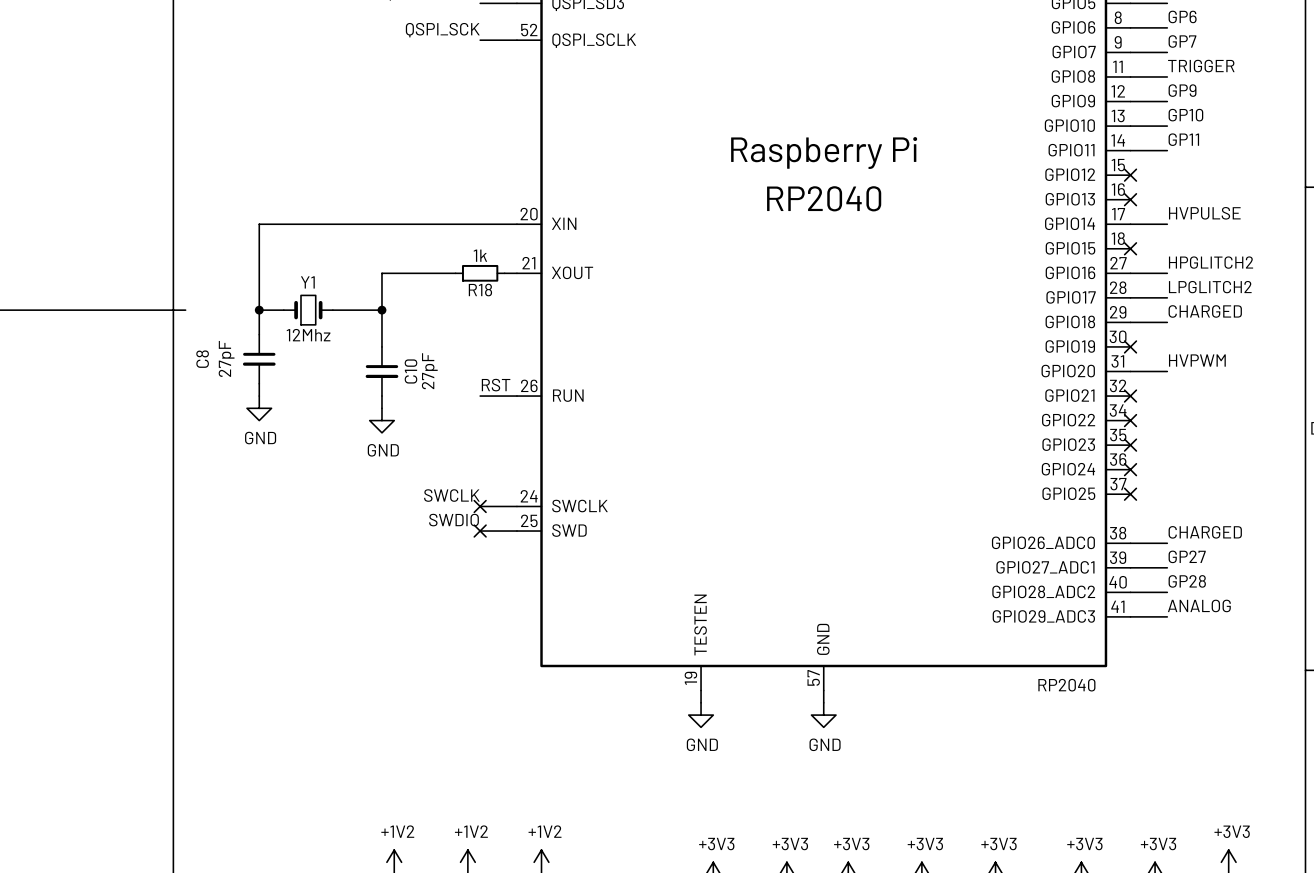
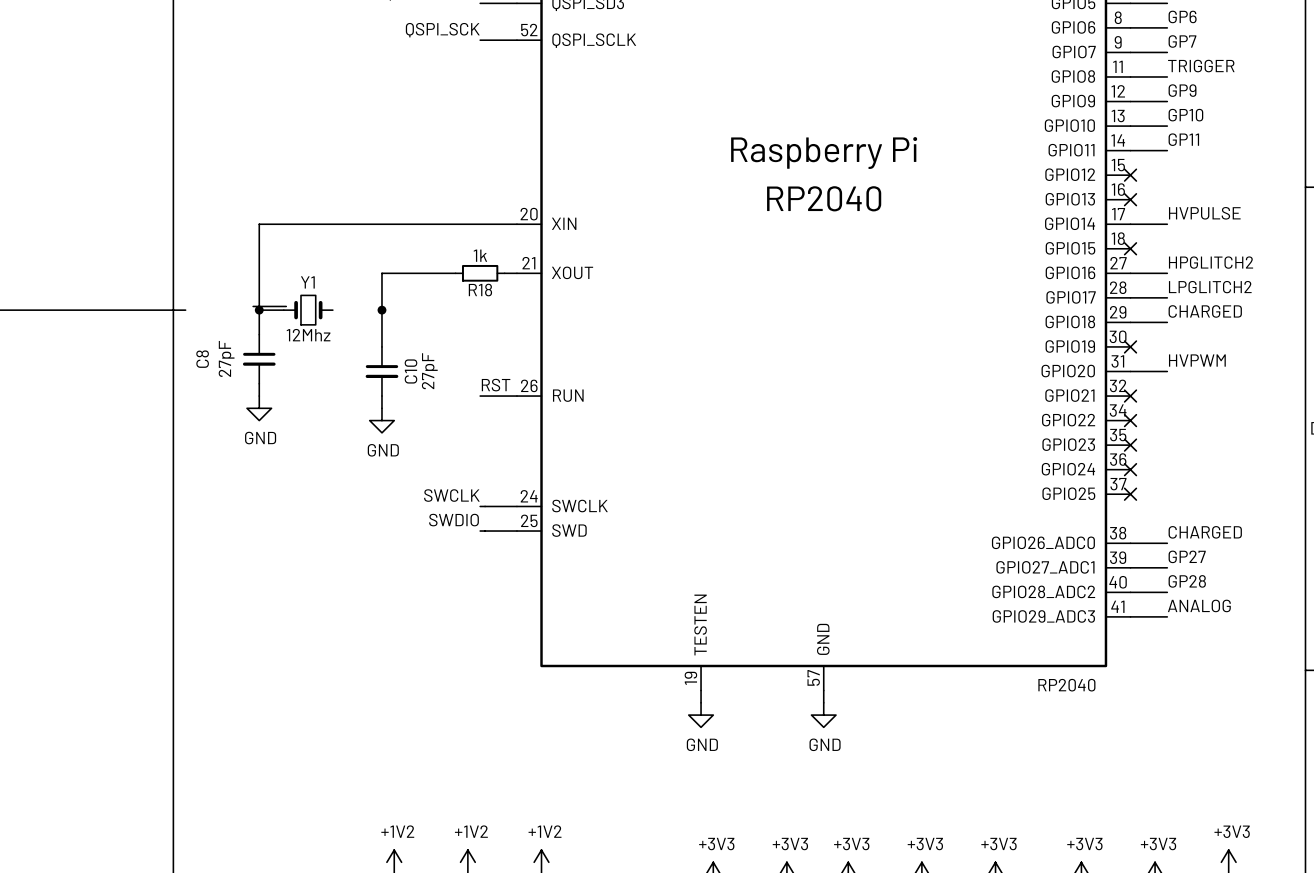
wire: none -> (253, 306) (286, 306)
wire: (332, 310) (381, 310) -> none
no-connect mark: (480, 506) -> none
no-connect mark: (480, 531) -> none

